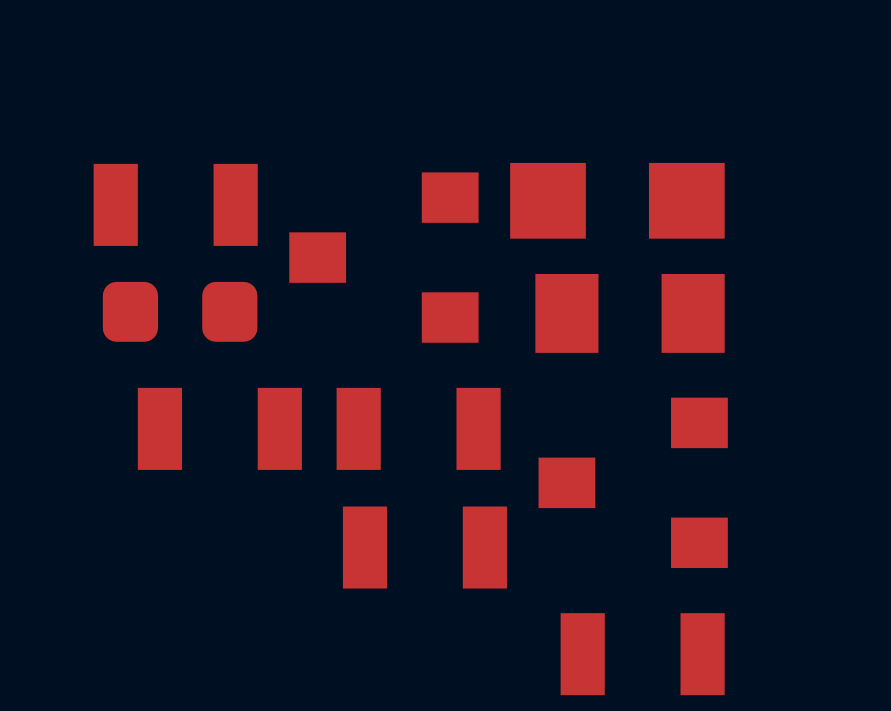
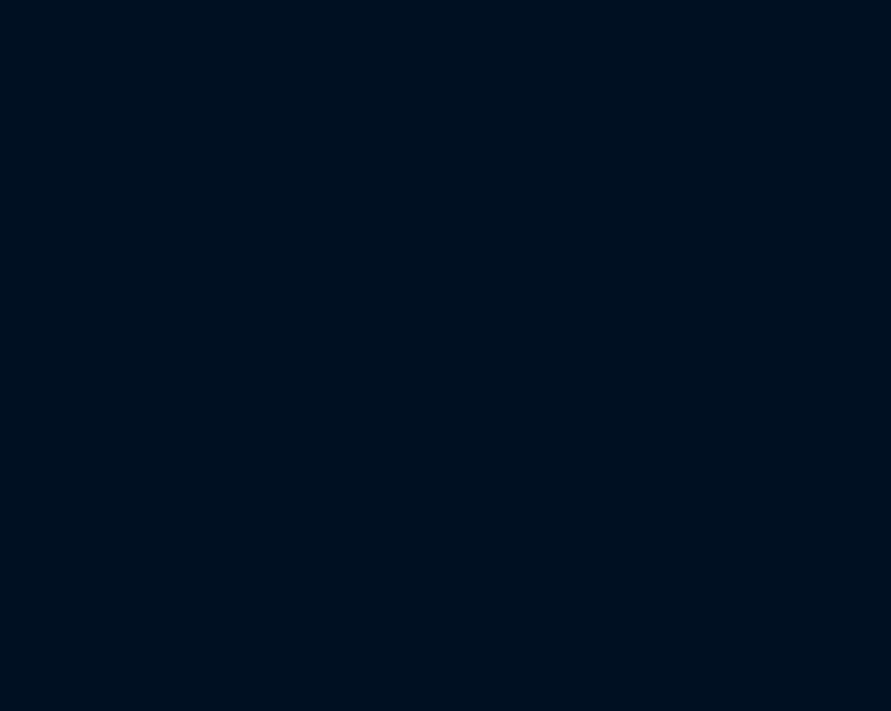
part: (617, 200) -> none
part: (175, 204) -> none
part: (383, 257) -> none
part: (180, 311) -> none
part: (630, 313) -> none
part: (219, 428) -> none
part: (418, 428) -> none
part: (633, 482) -> none
part: (424, 547) -> none
part: (642, 654) -> none

